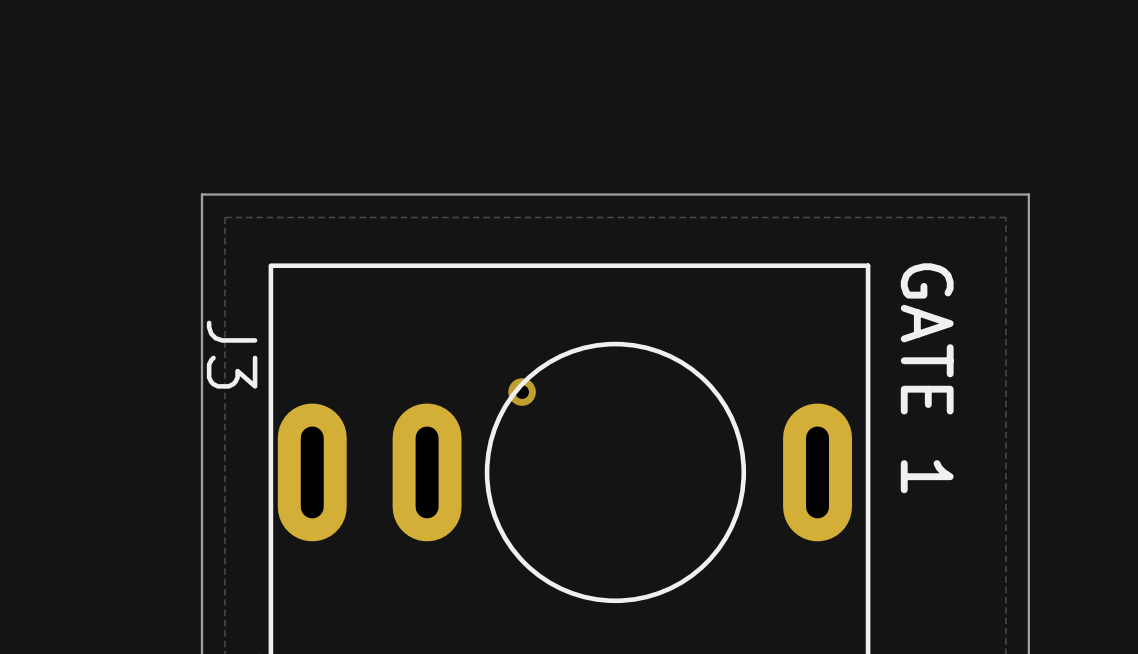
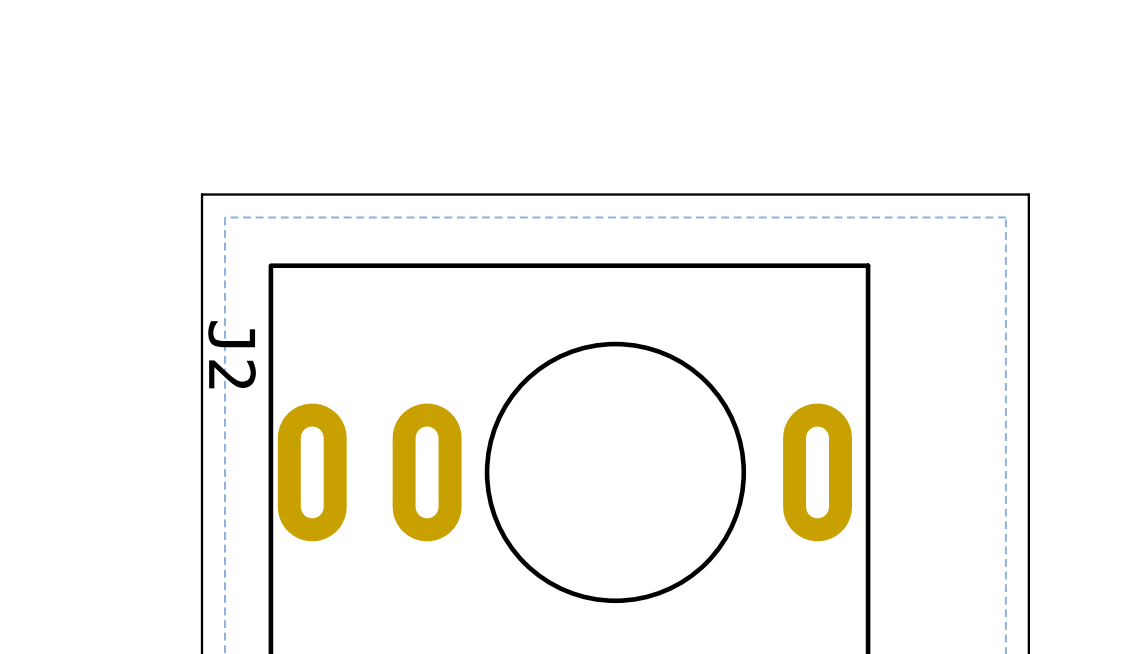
J3 name: J3 (232, 354) -> J2 (232, 354)
J3 text: GATE 1 (927, 378) -> none
via: (522, 392) -> none

